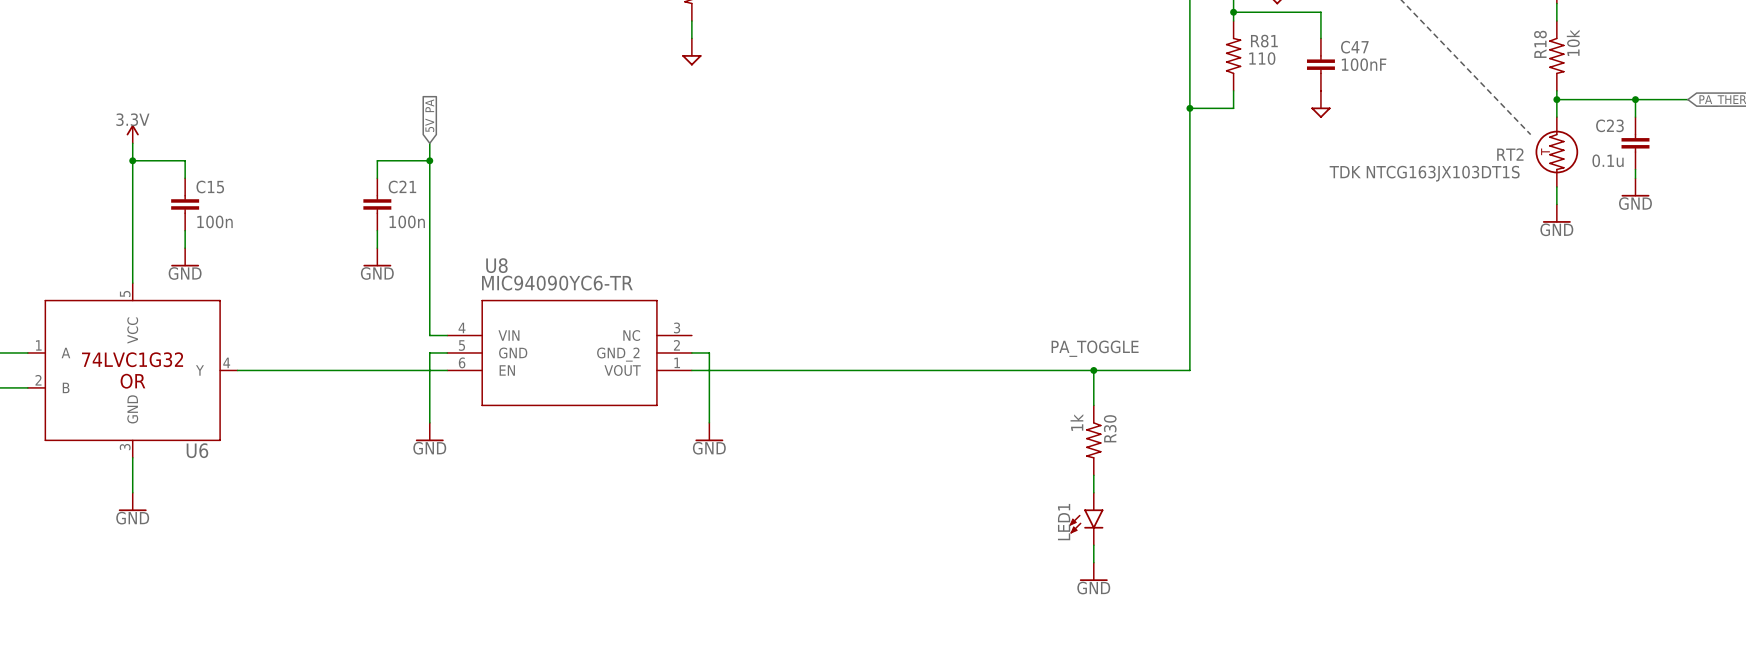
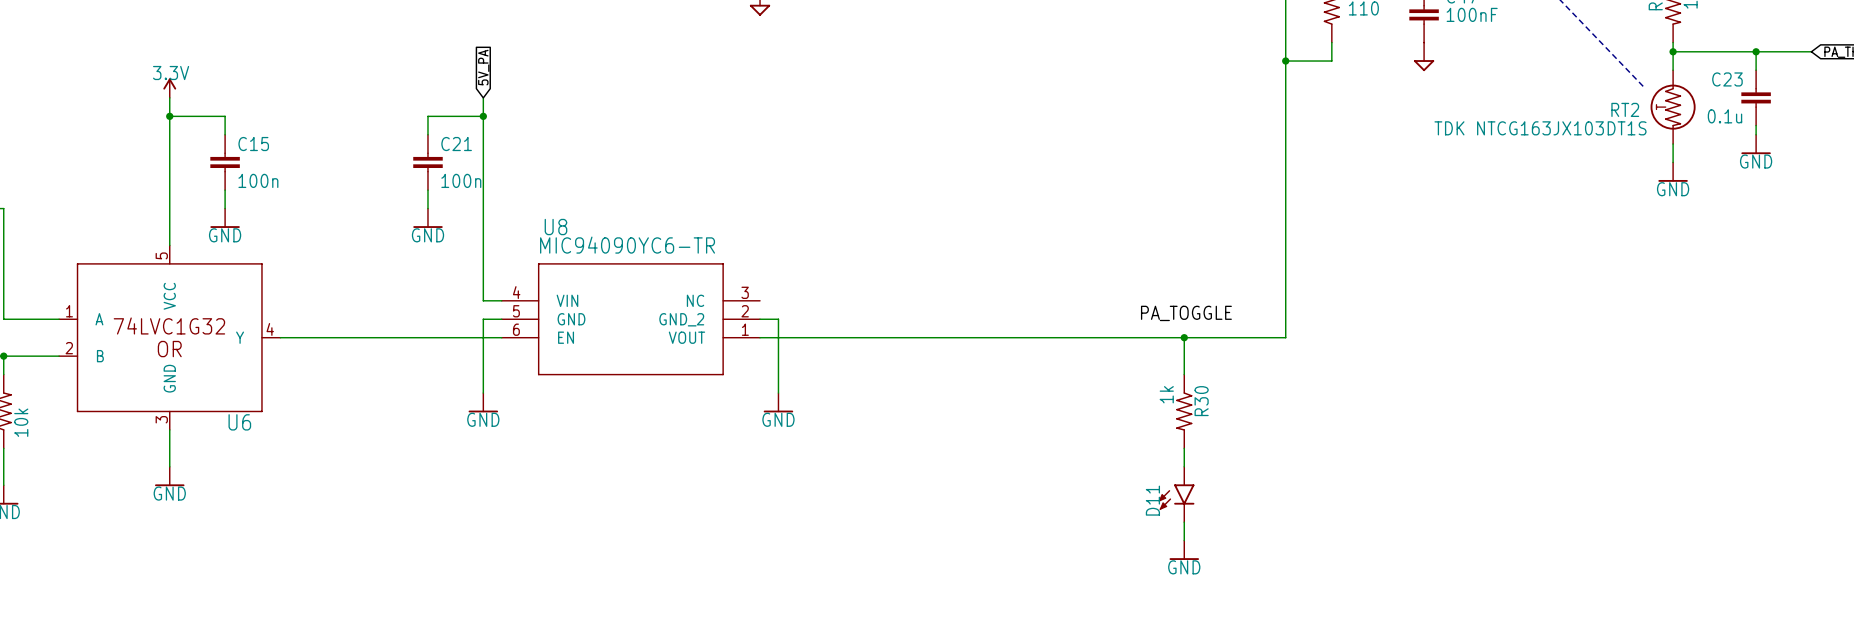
LED1 name: LED1 (1064, 522) -> D11 (1152, 500)

